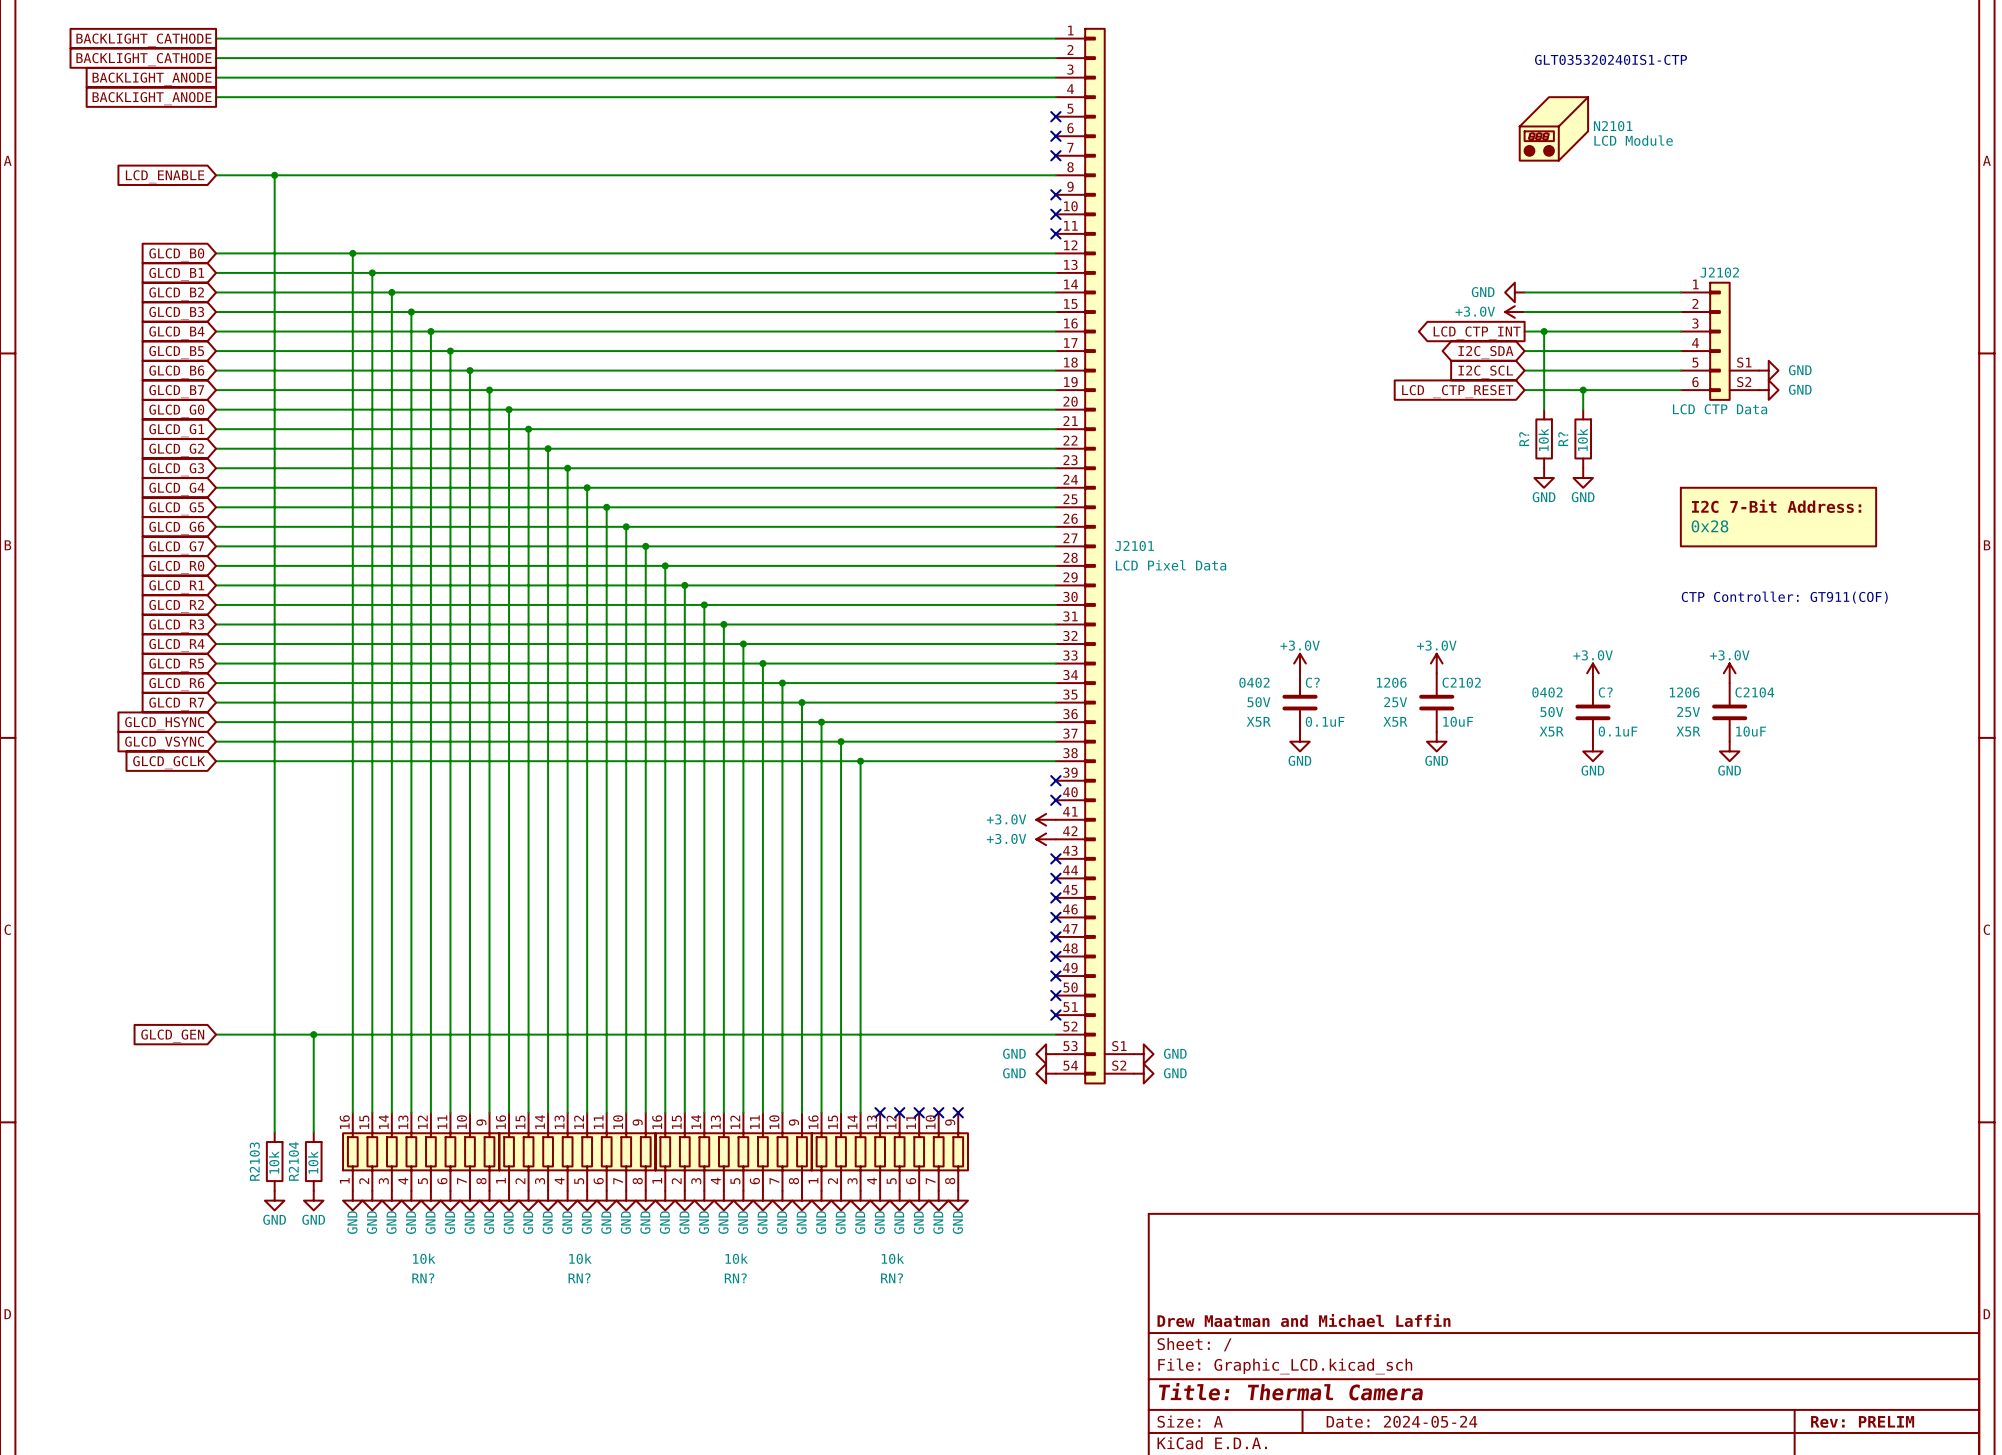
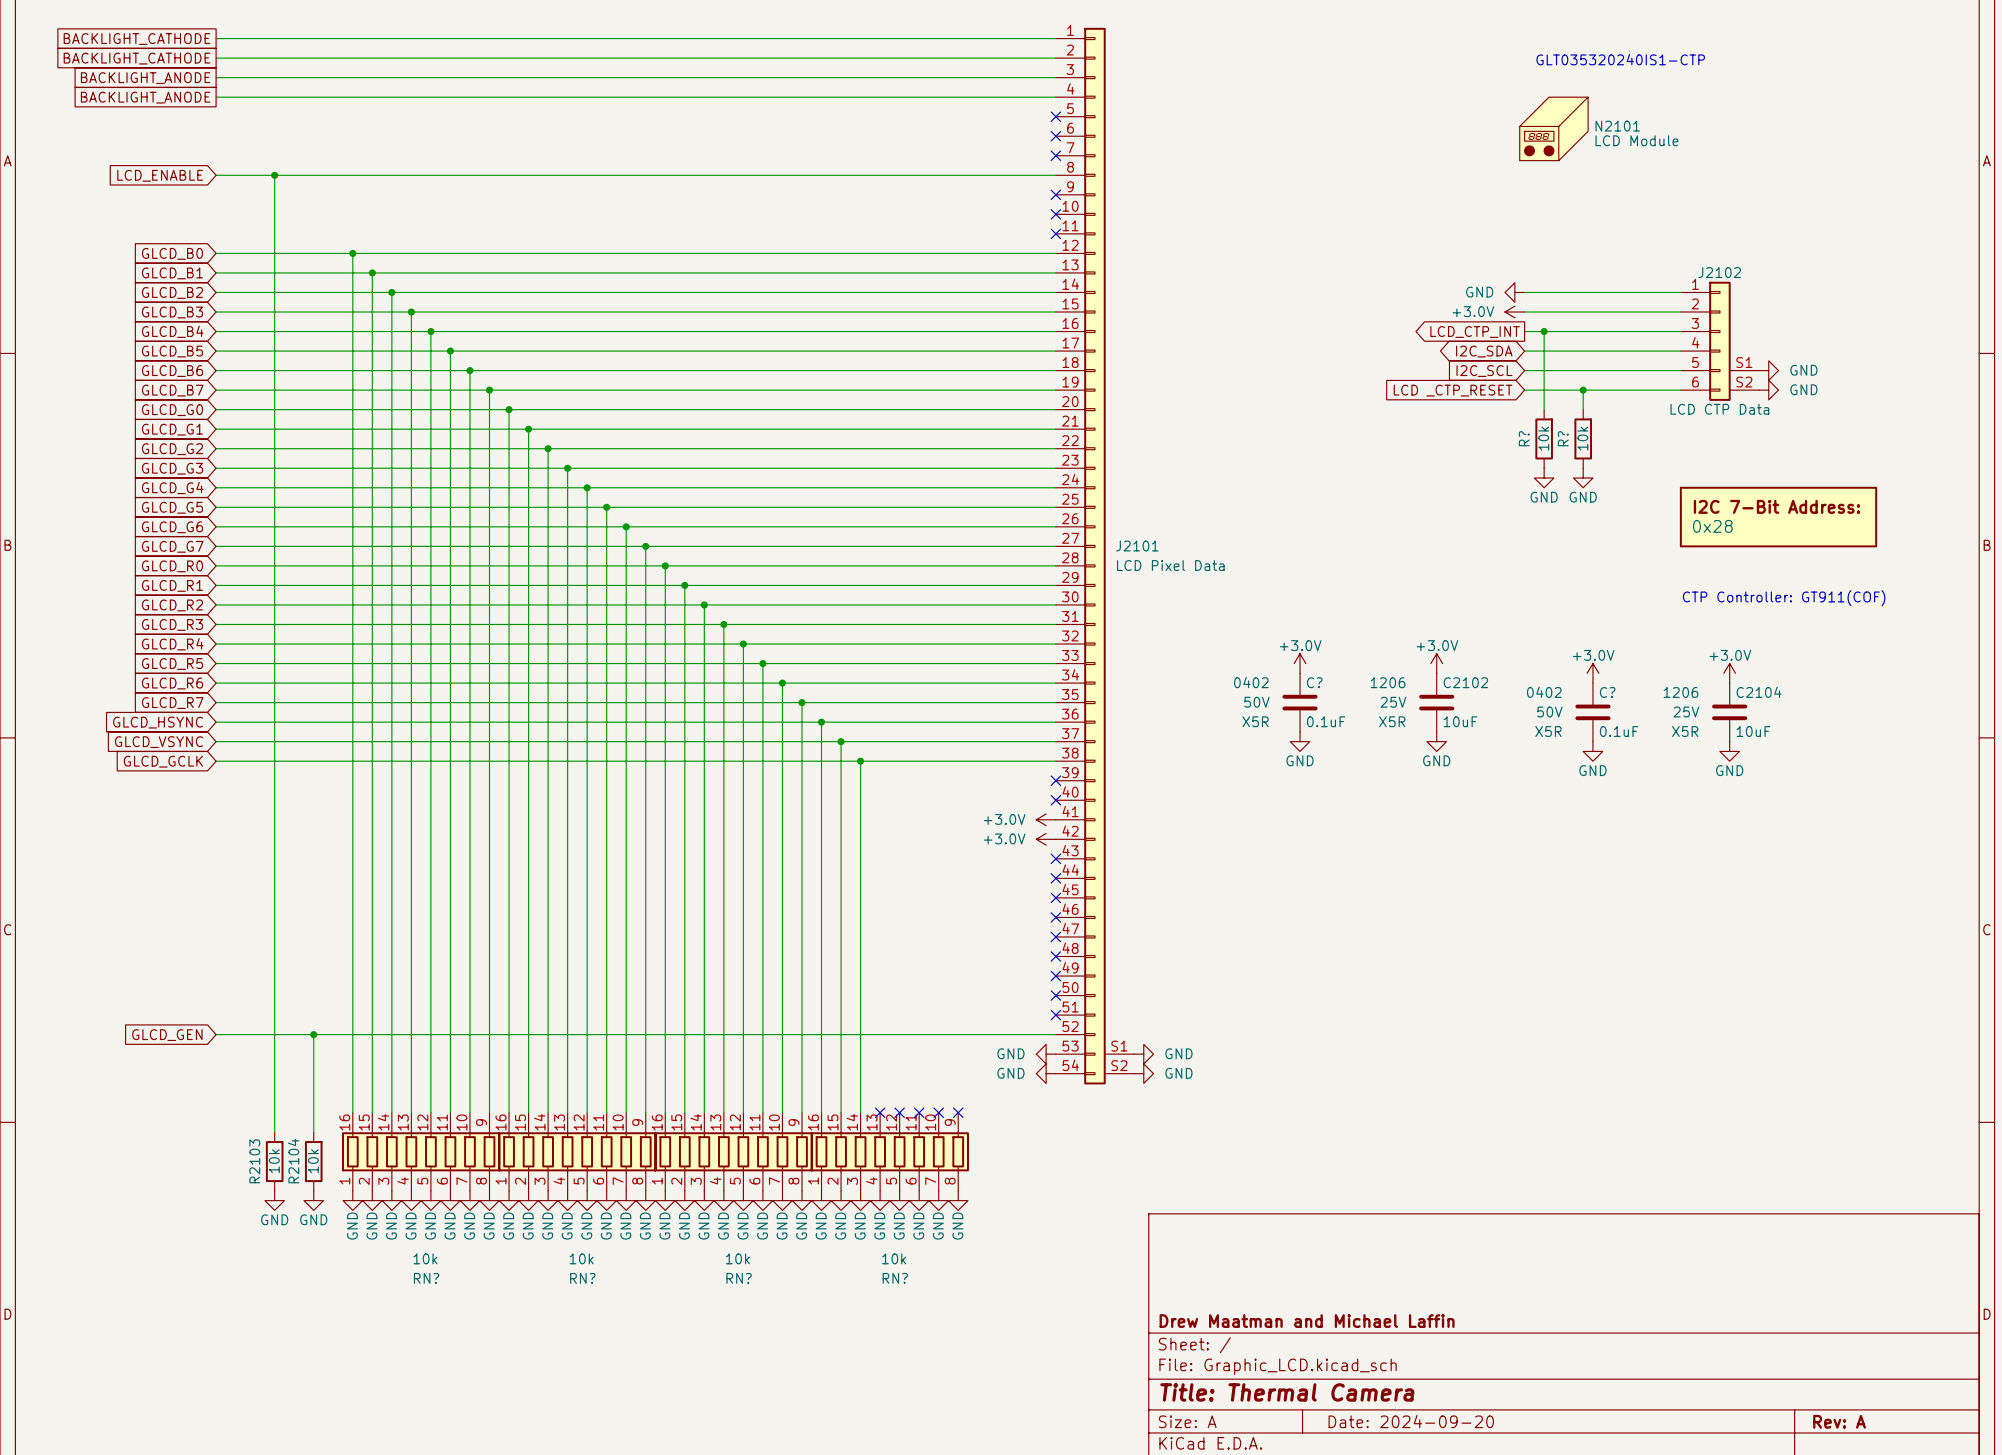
title block: Date: 2024-05-24 (1401, 1421) -> Date: 2024-09-20 (1411, 1421)
title block: Rev: PRELIM (1862, 1421) -> Rev: A (1839, 1421)

